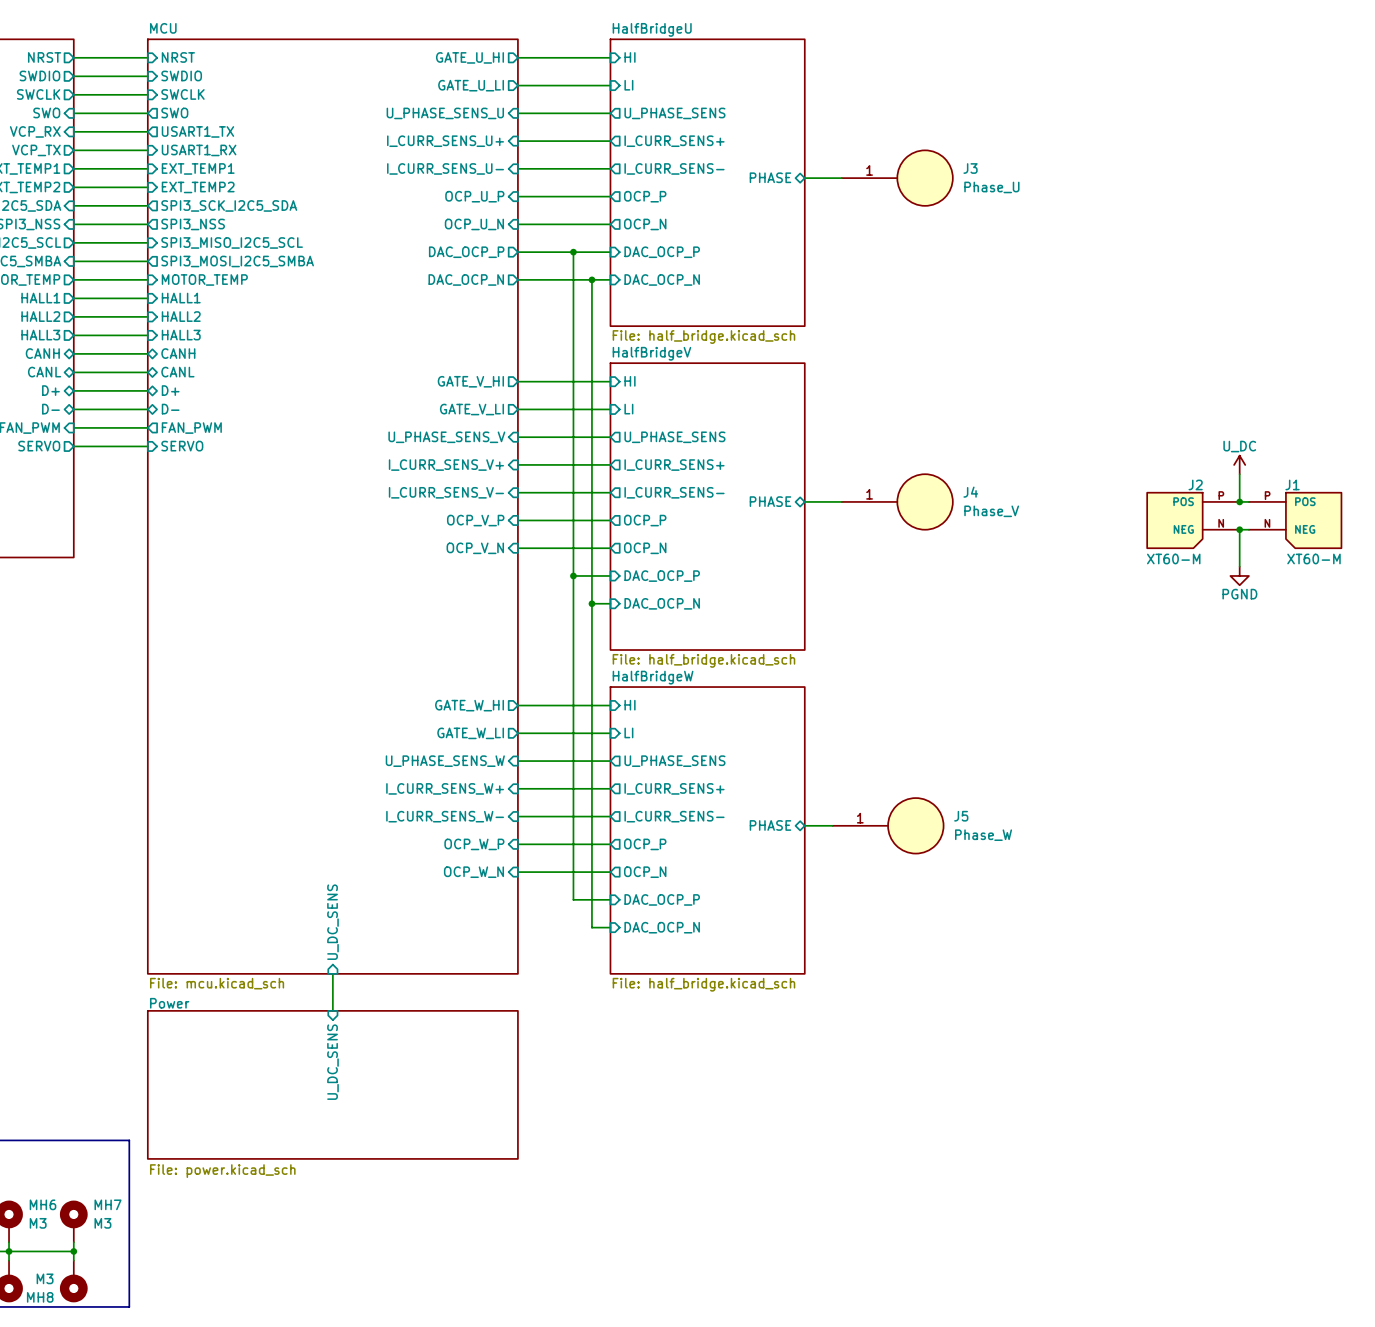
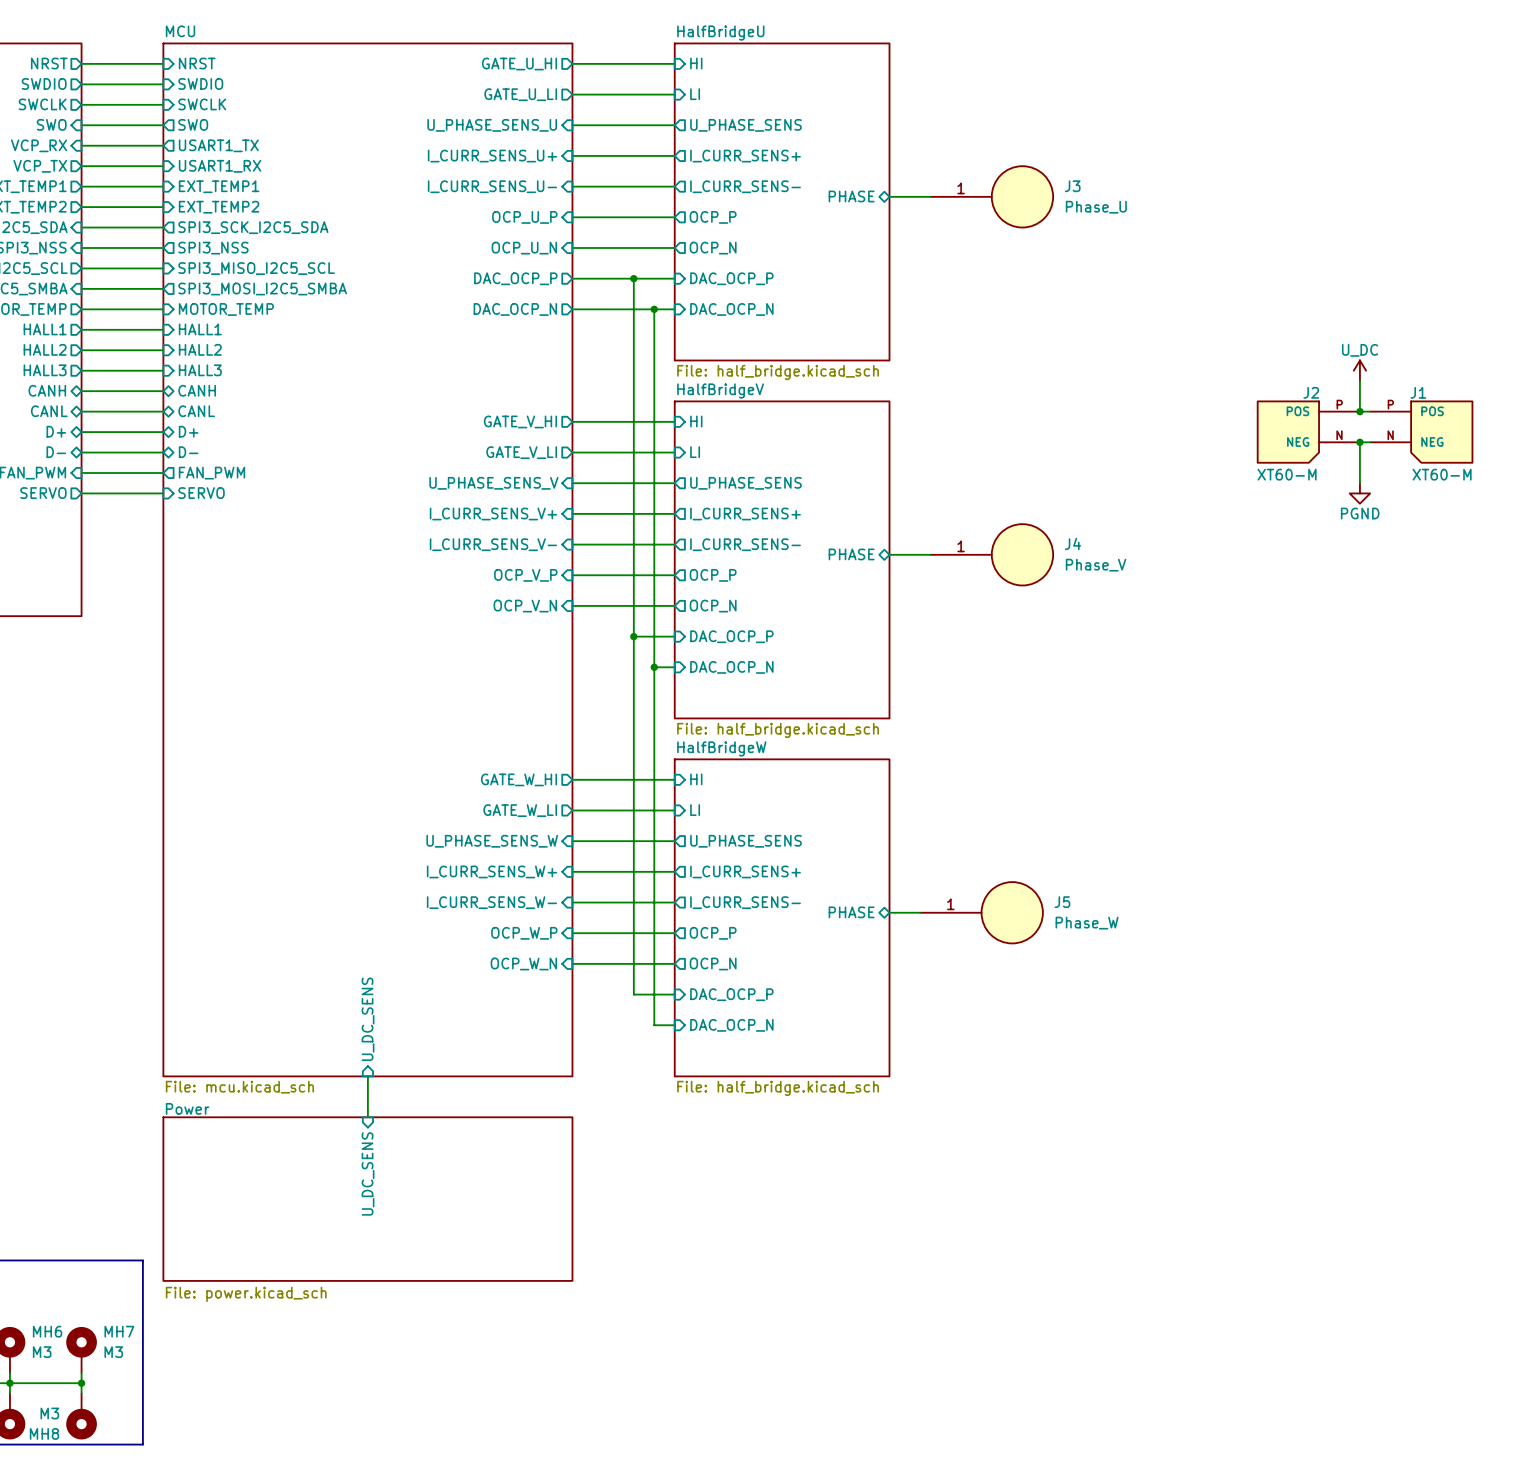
junction: none -> (1359, 411)
junction: none -> (1359, 442)
power symbol position: U_DC (1239, 464) -> U_DC (1359, 370)
wire: (1239, 474) (1239, 501) (1248, 501) -> (1359, 380) (1359, 411) (1370, 411)
junction: (1239, 501) -> none
J2 position: (1193, 520) -> (1308, 432)
J1 position: (1295, 520) -> (1421, 432)
junction: (1239, 529) -> none
wire: (1248, 529) (1239, 529) (1239, 566) -> (1370, 442) (1359, 442) (1359, 483)
power symbol position: PGND (1239, 575) -> PGND (1359, 493)

